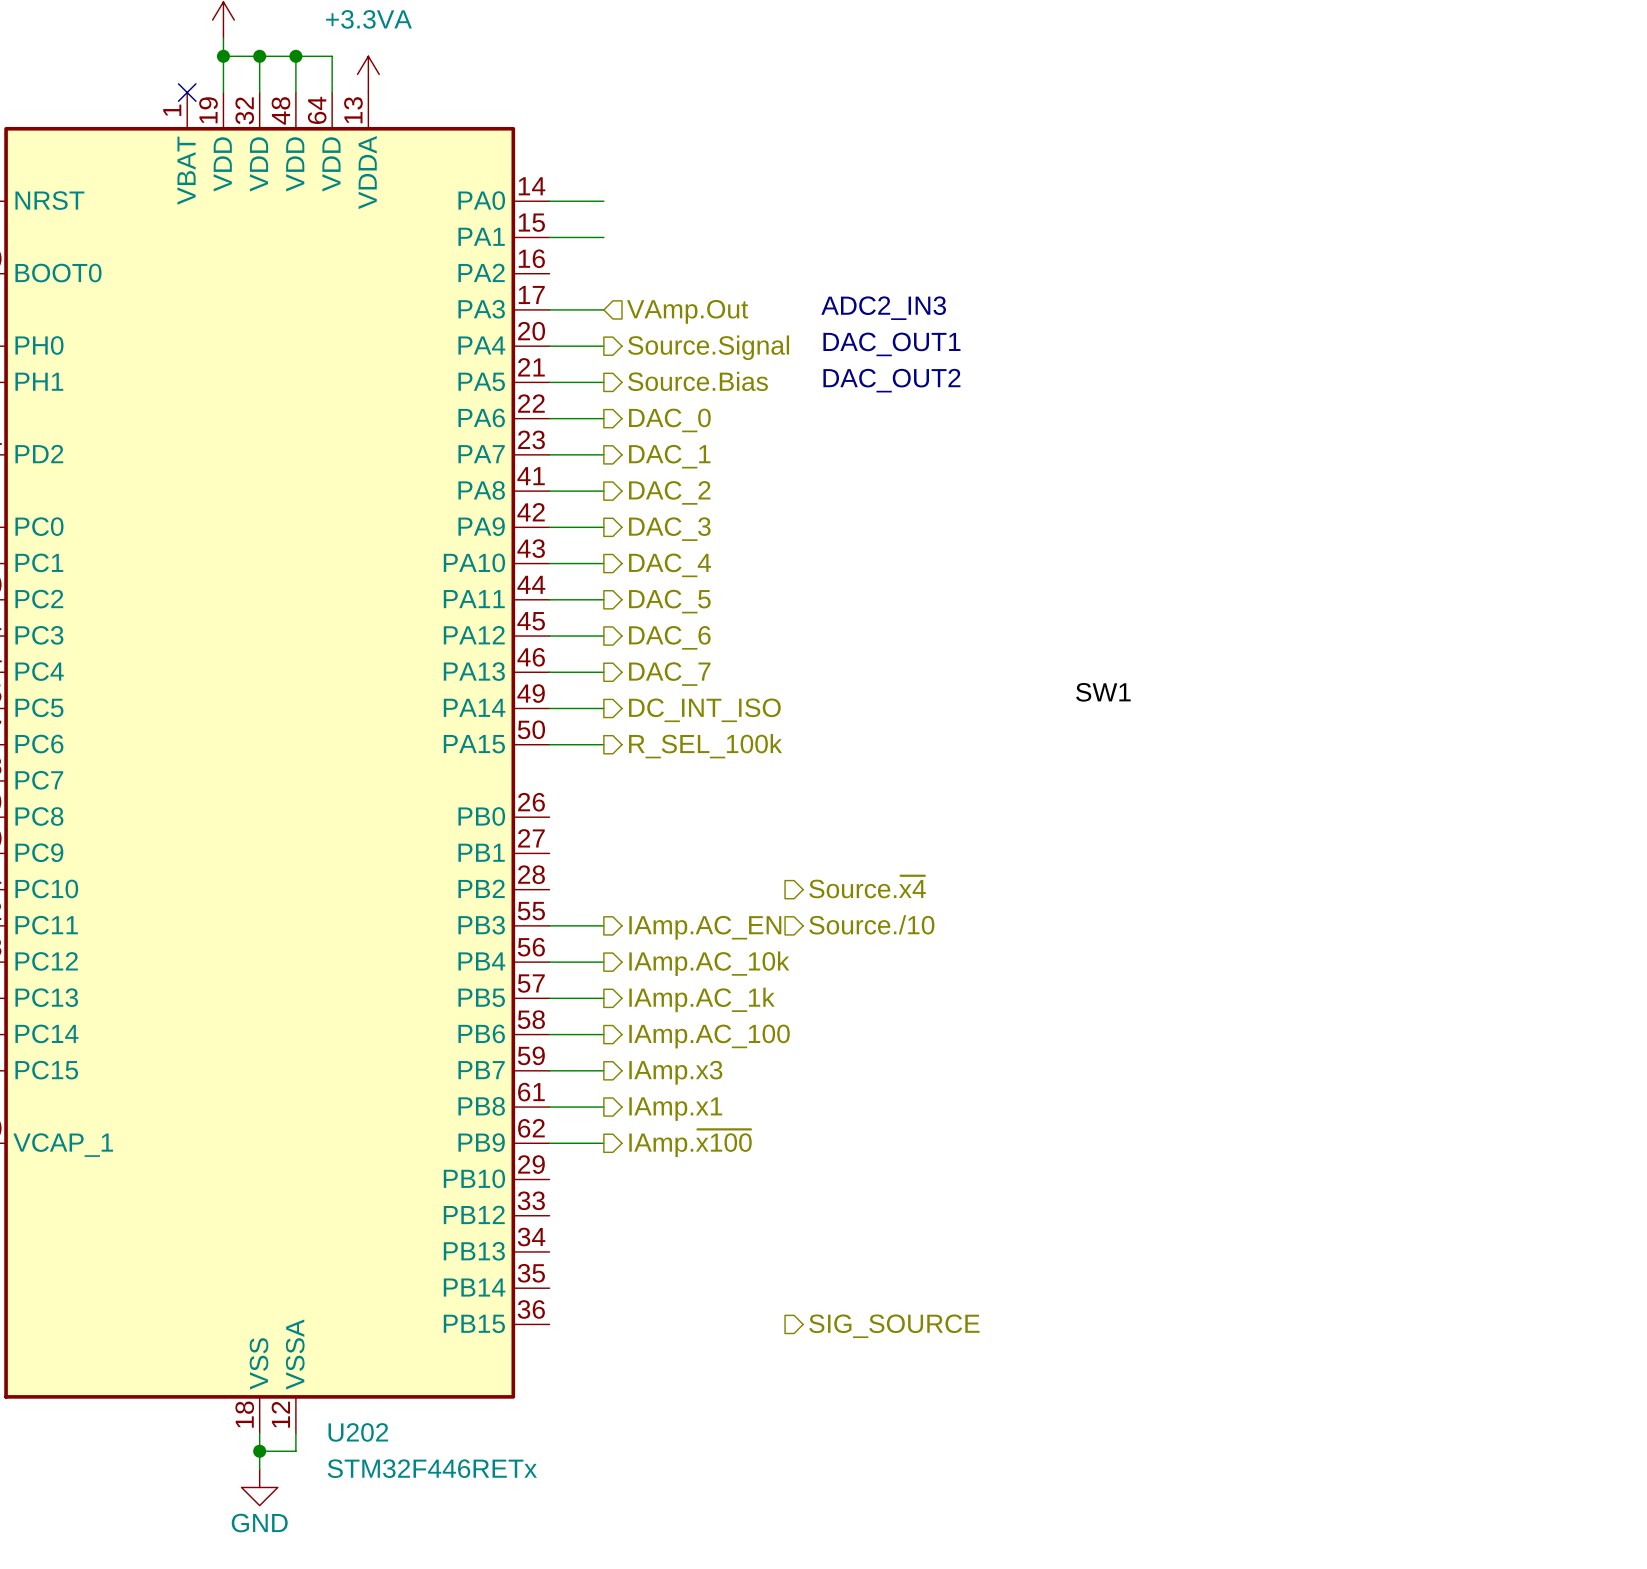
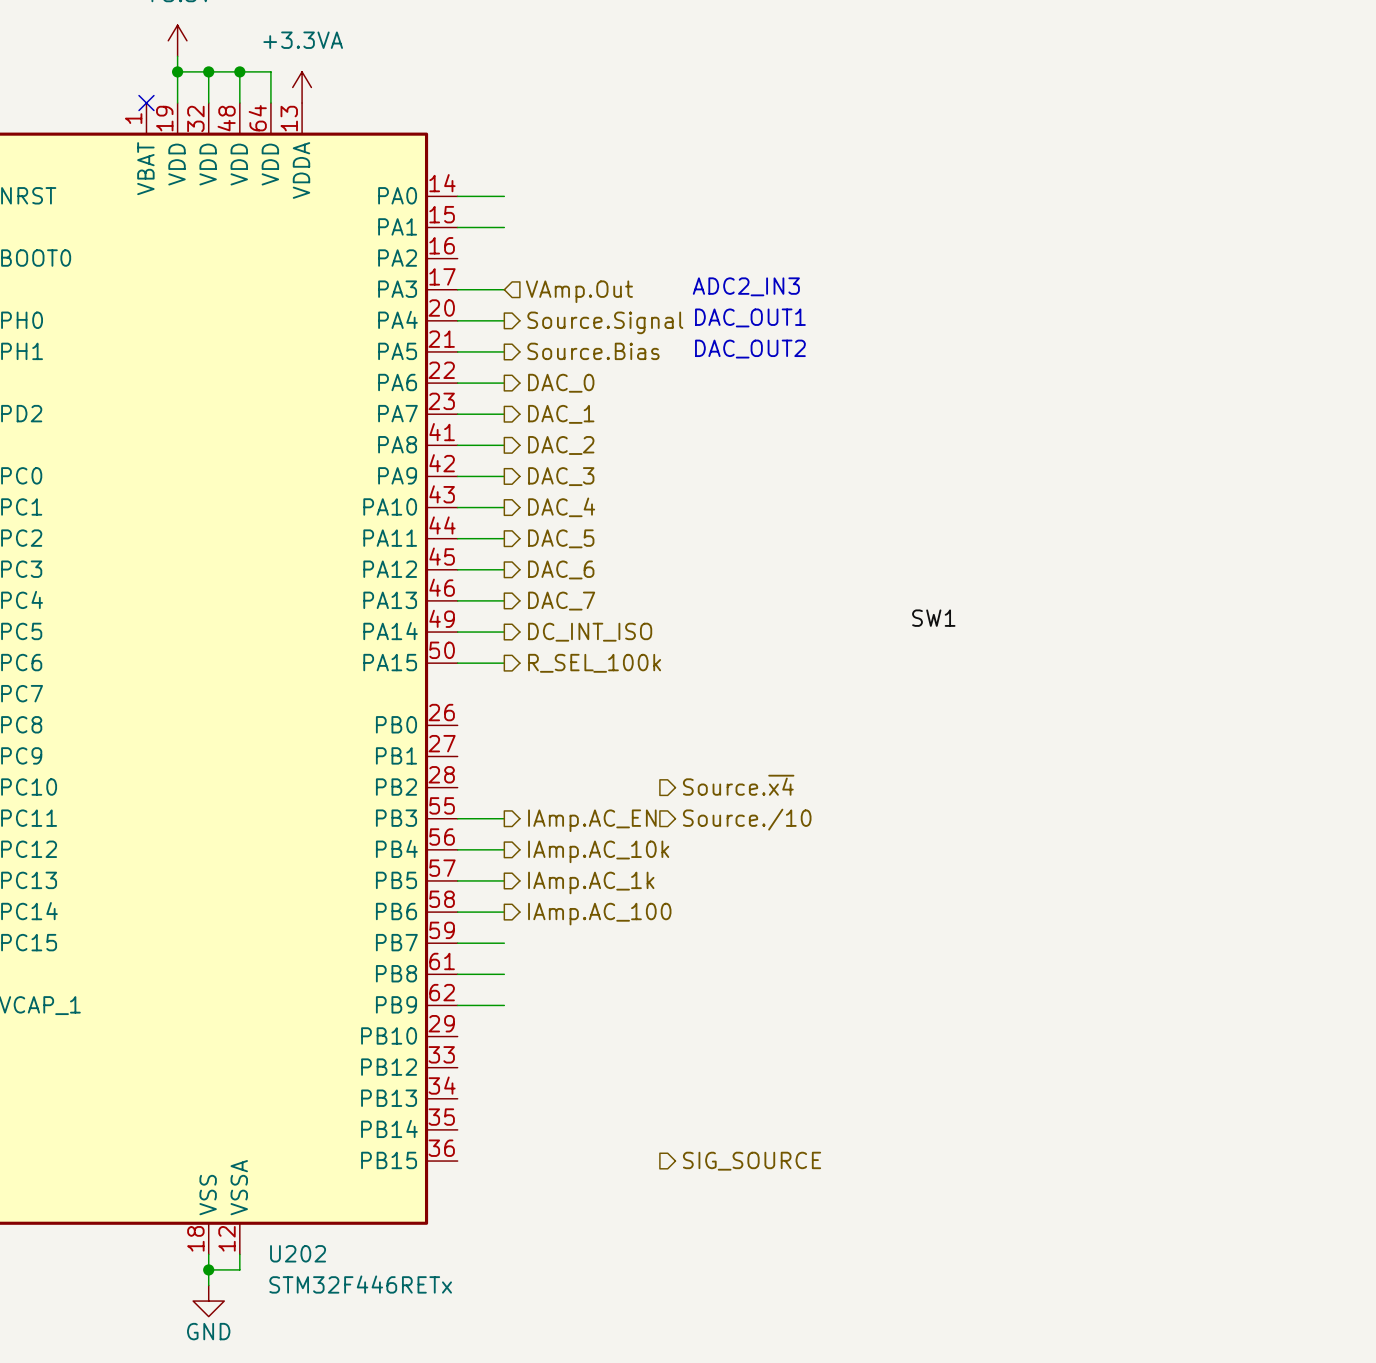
hierarchical label: IAmp.x3 (675, 1072) -> none
hierarchical label: IAmp.x1 (675, 1109) -> none
hierarchical label: IAmp.~{x100} (690, 1143) -> none

